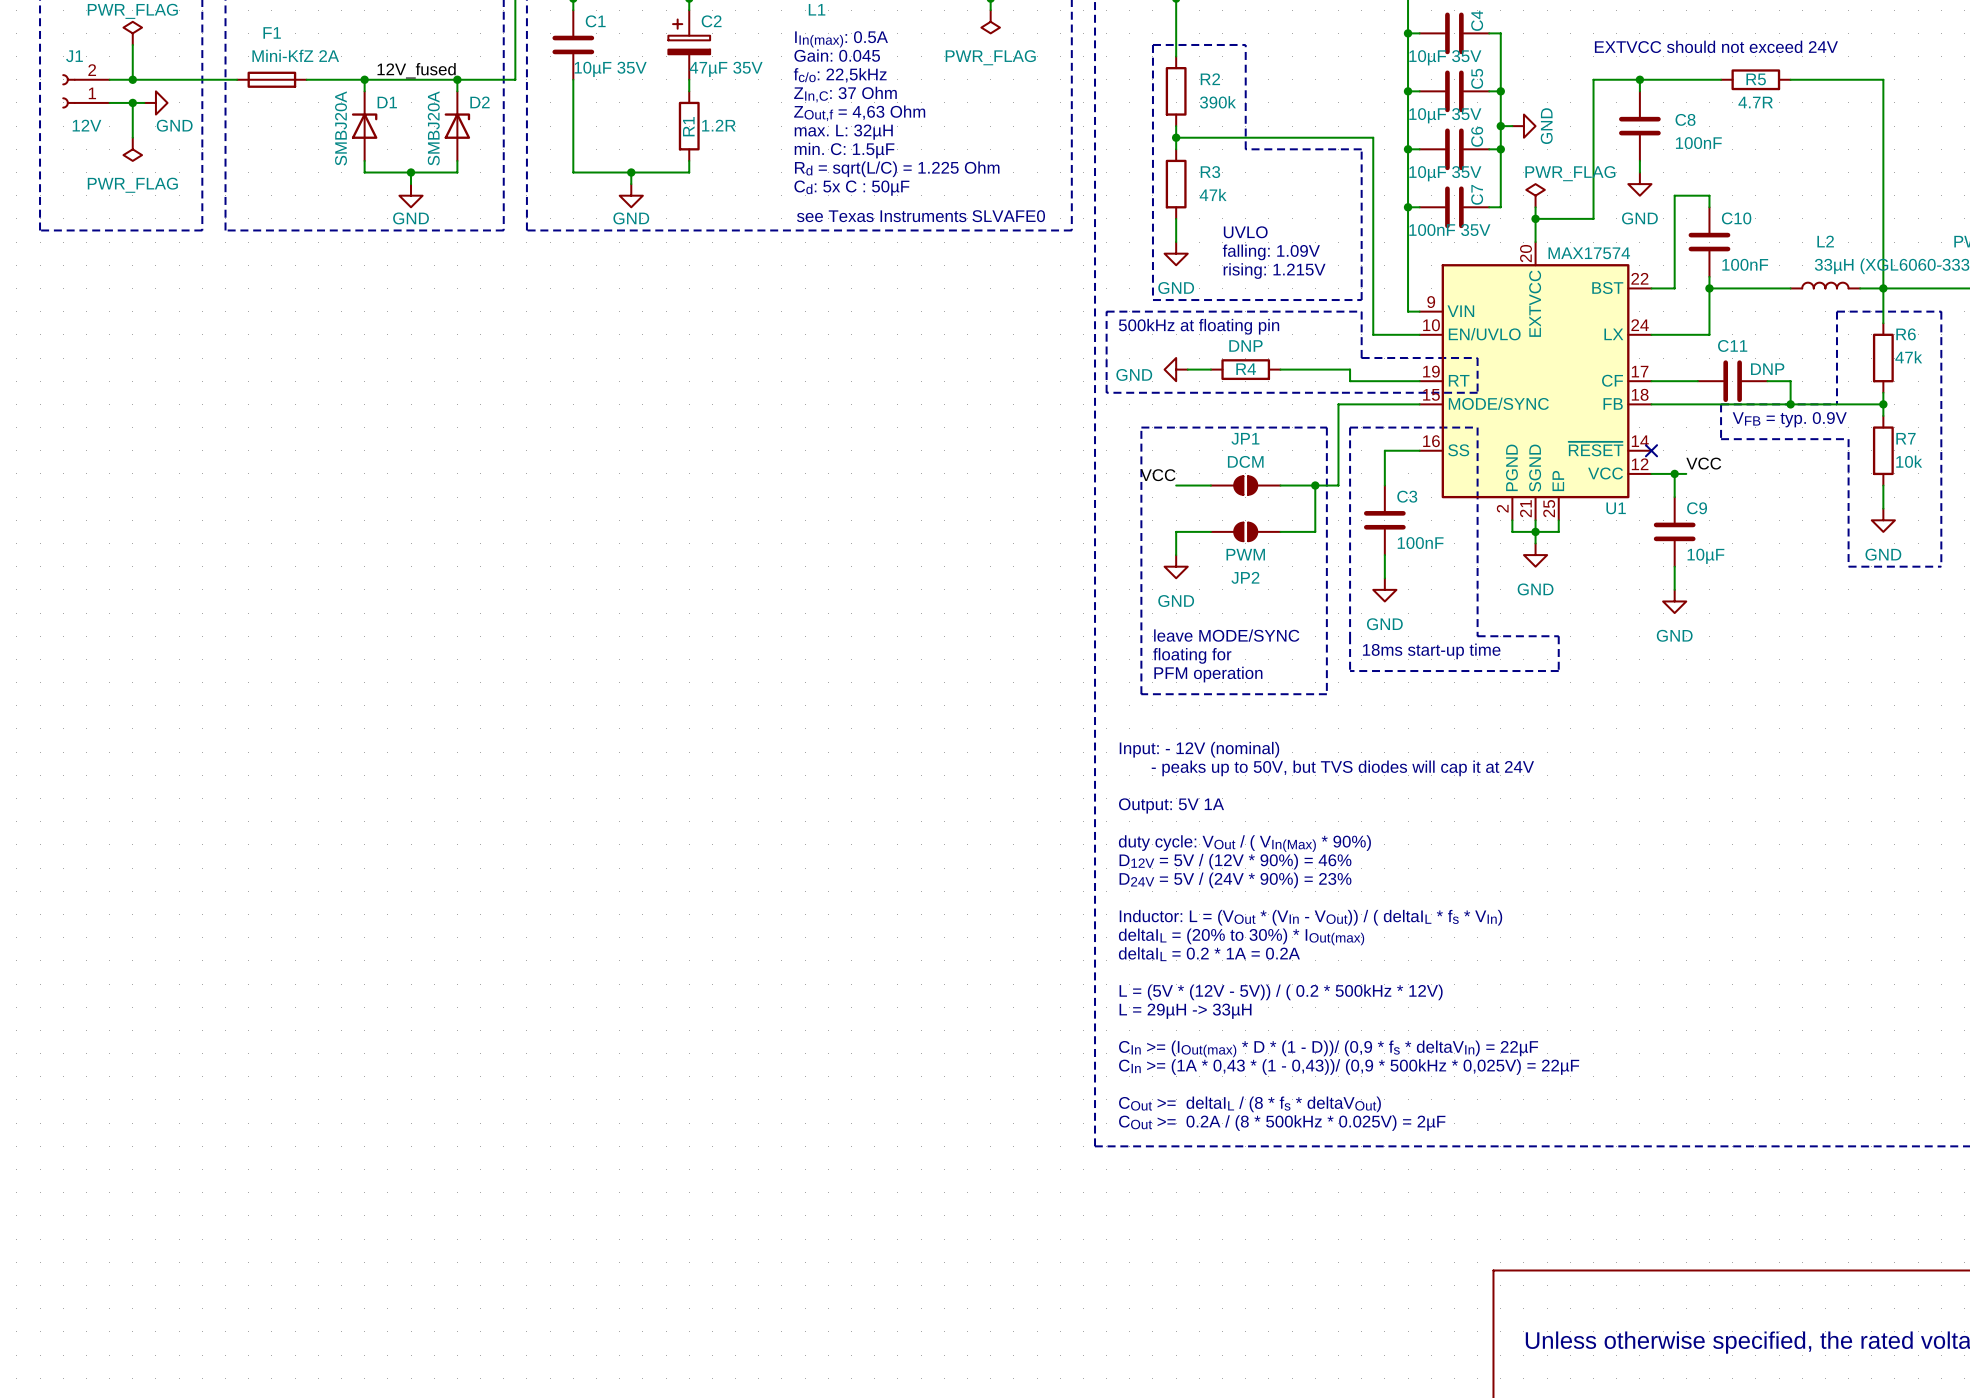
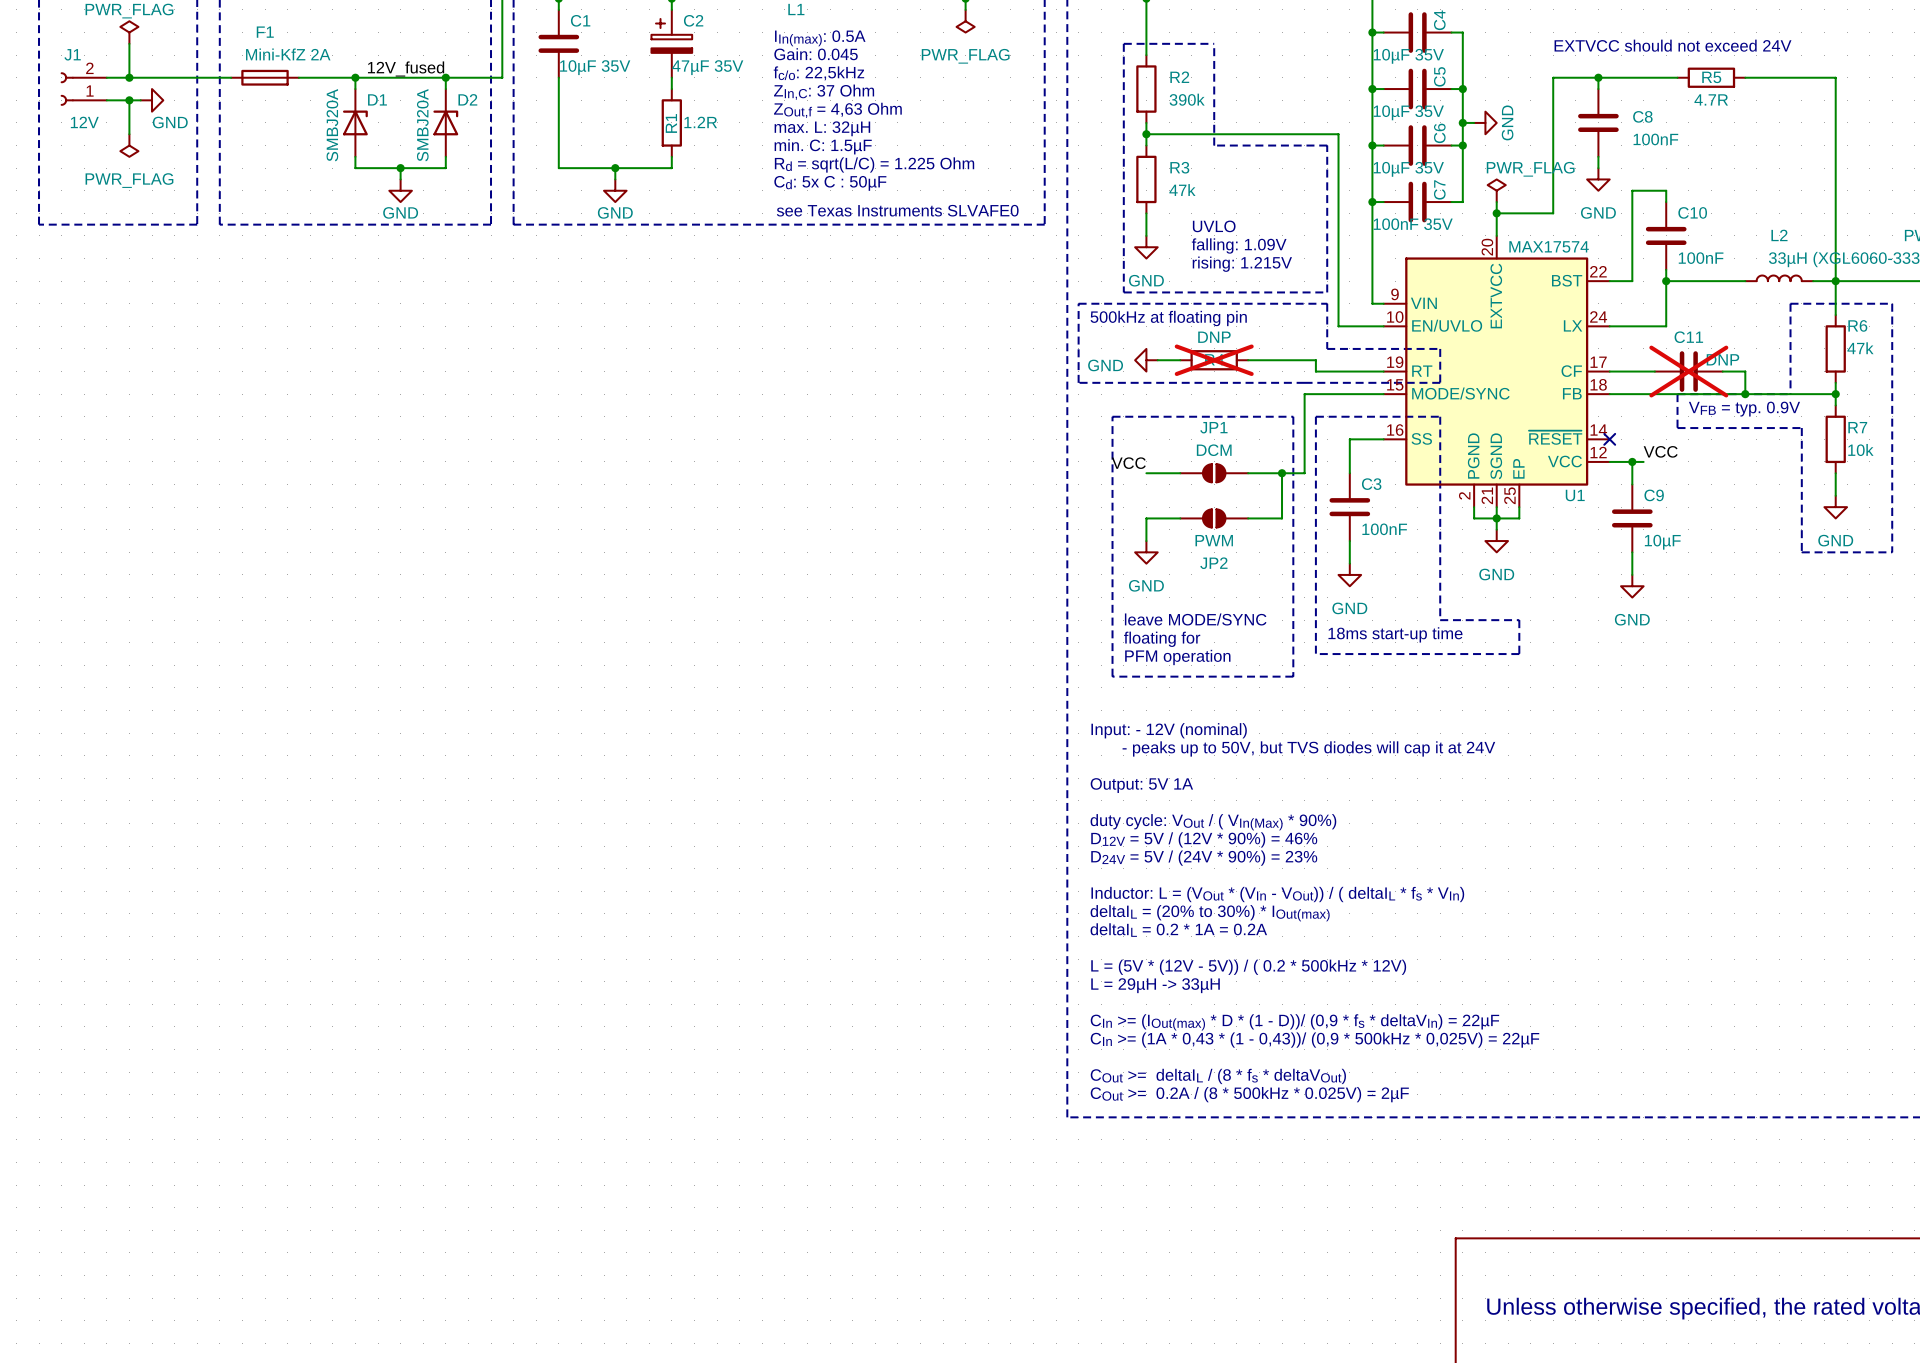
R4 do-not-place cross: none -> (1214, 360)
C11 do-not-place cross: none -> (1688, 371)

